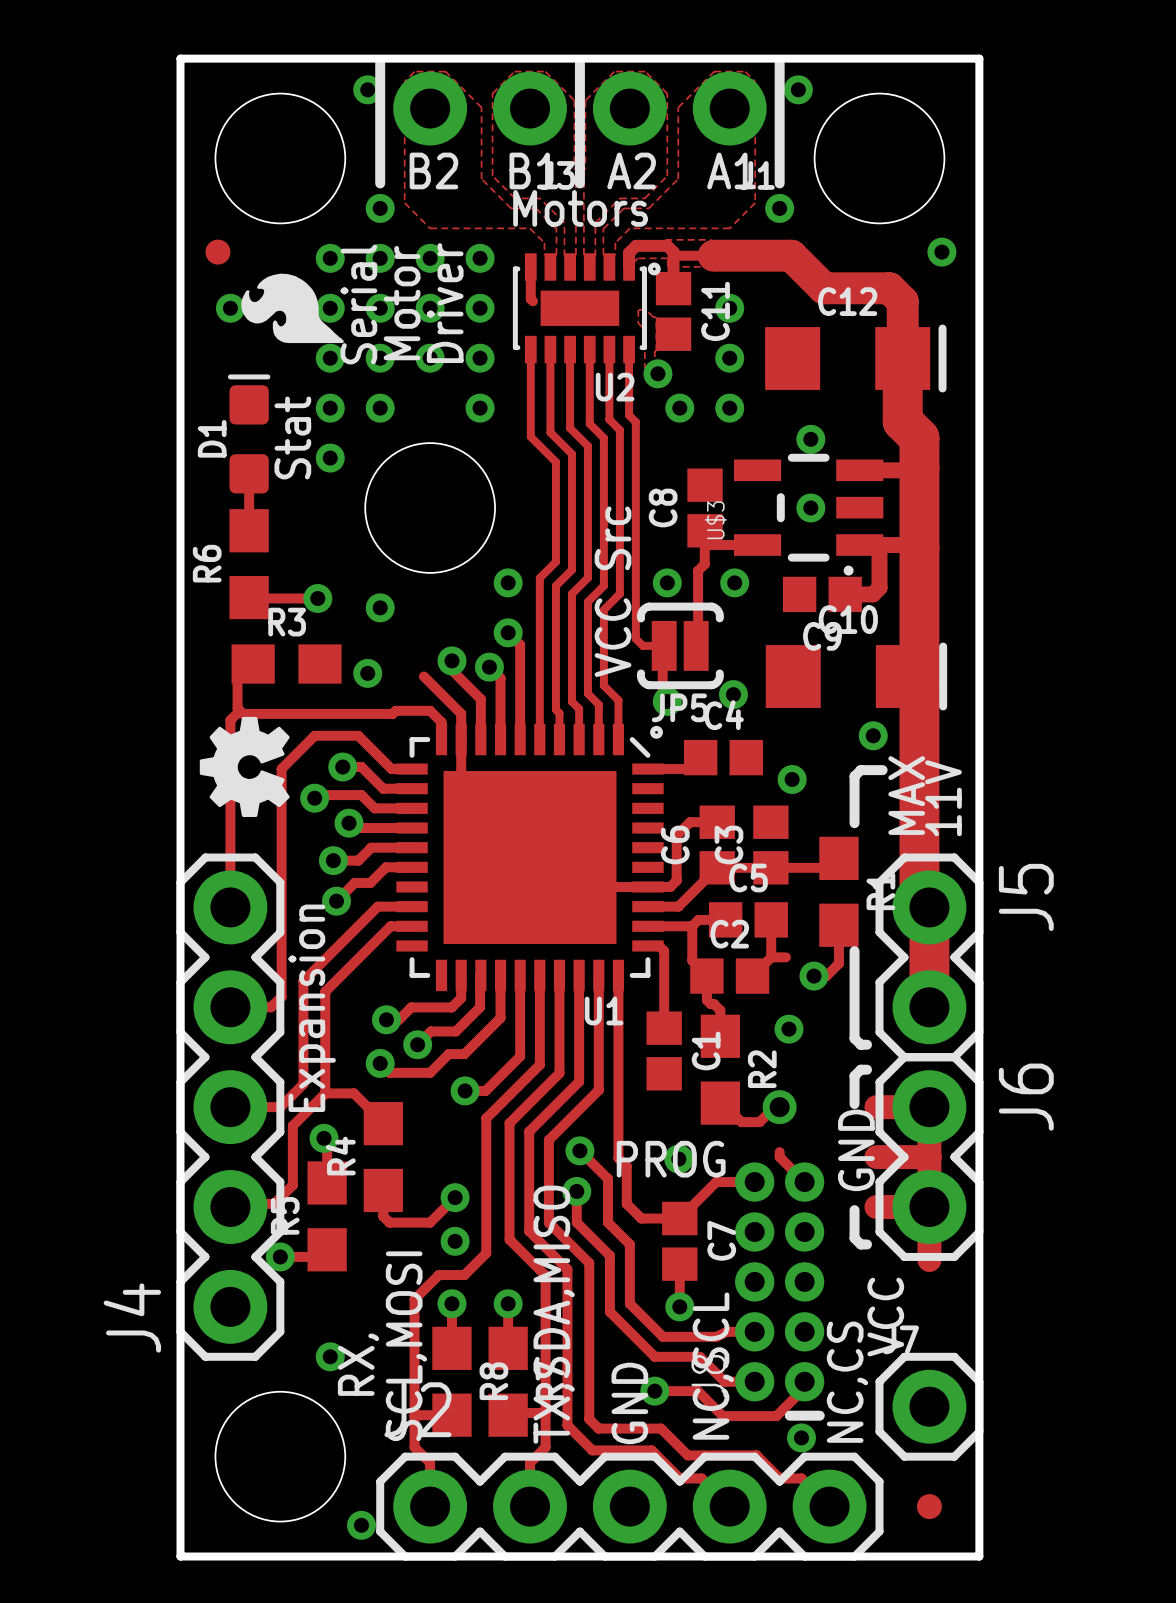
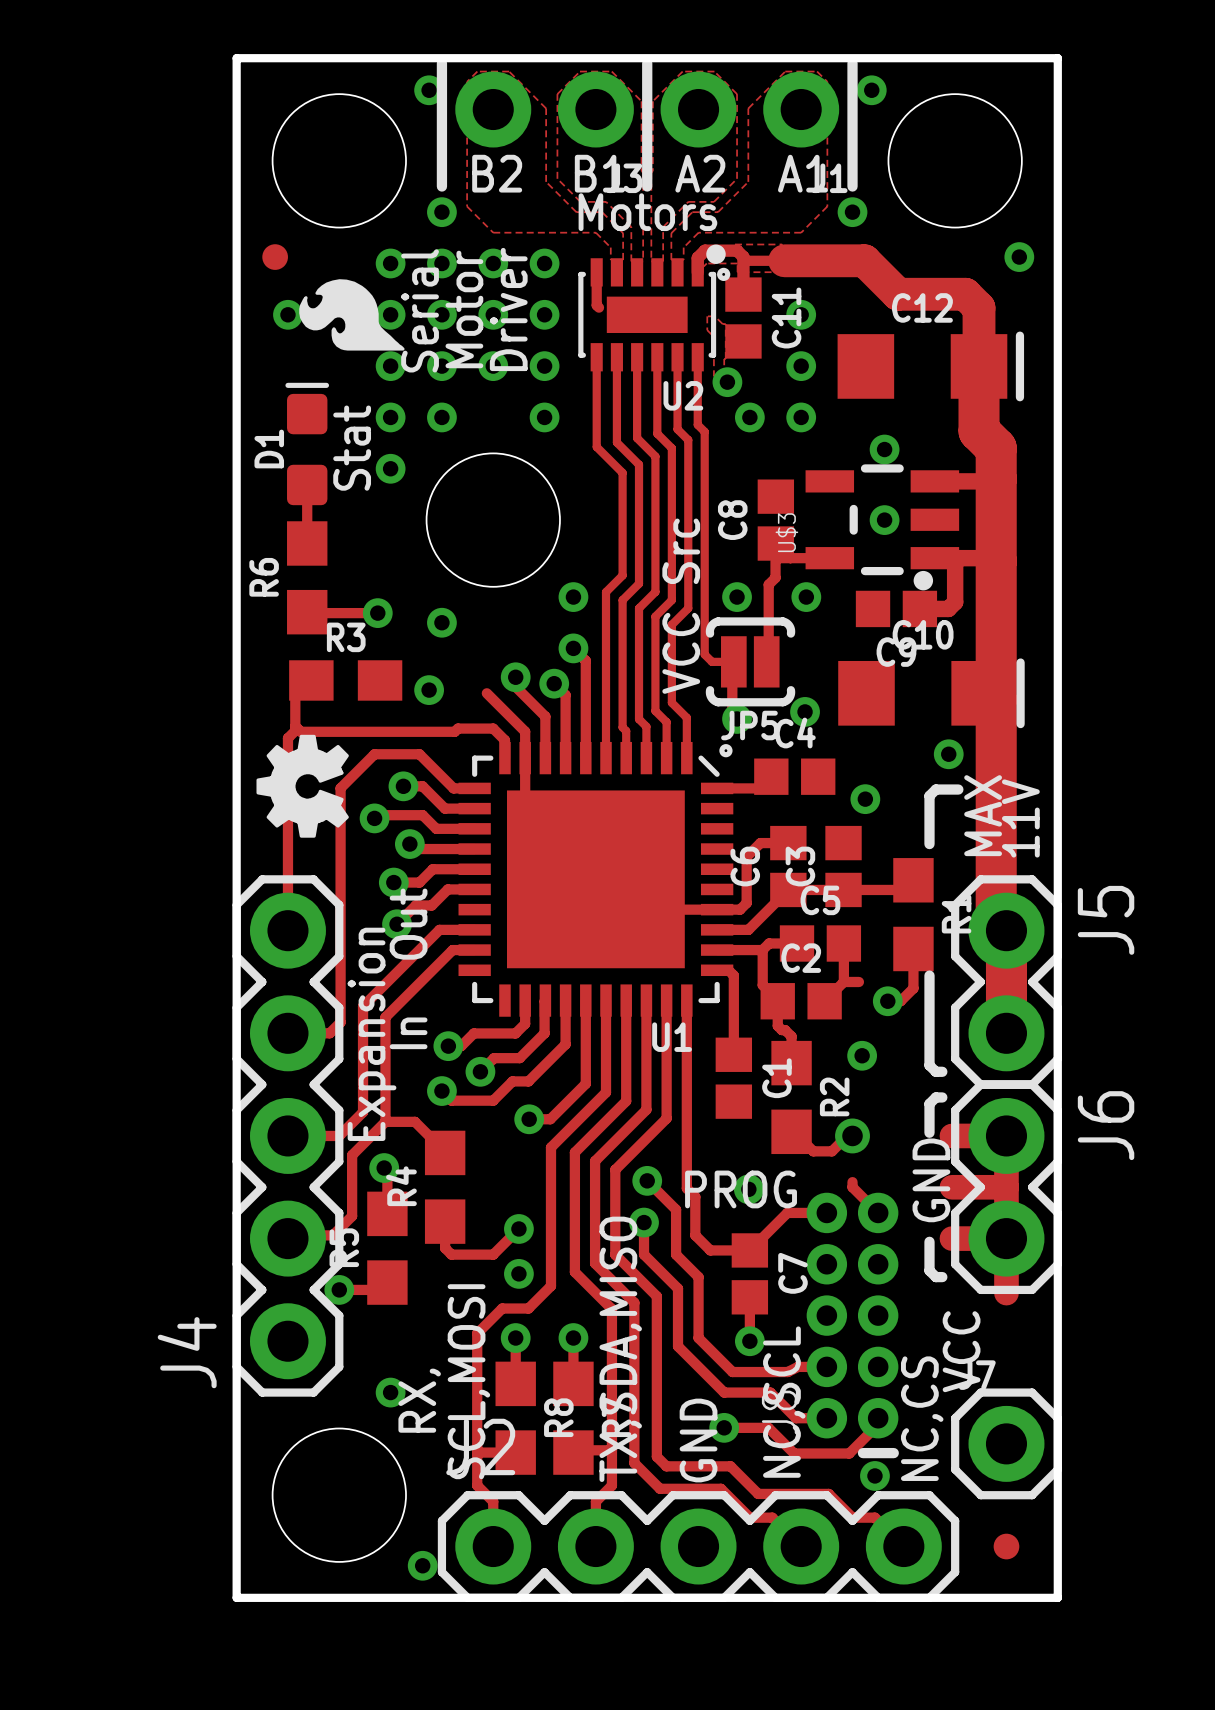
drawing: none -> [706, 244, 726, 264]
drawing: none -> [913, 570, 934, 591]
text: none -> Out (408, 924)
text: none -> In (408, 1033)

